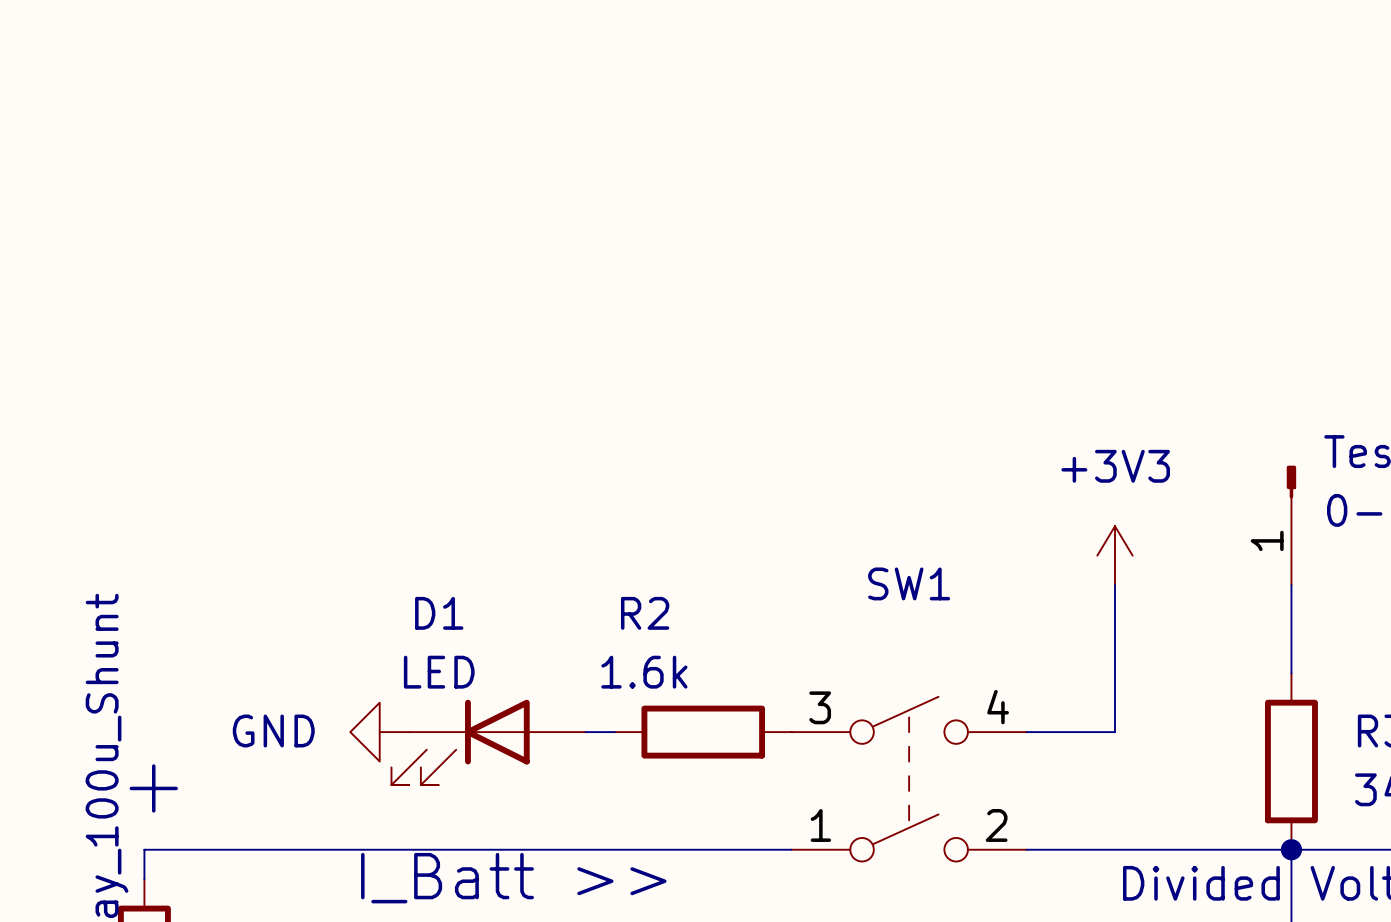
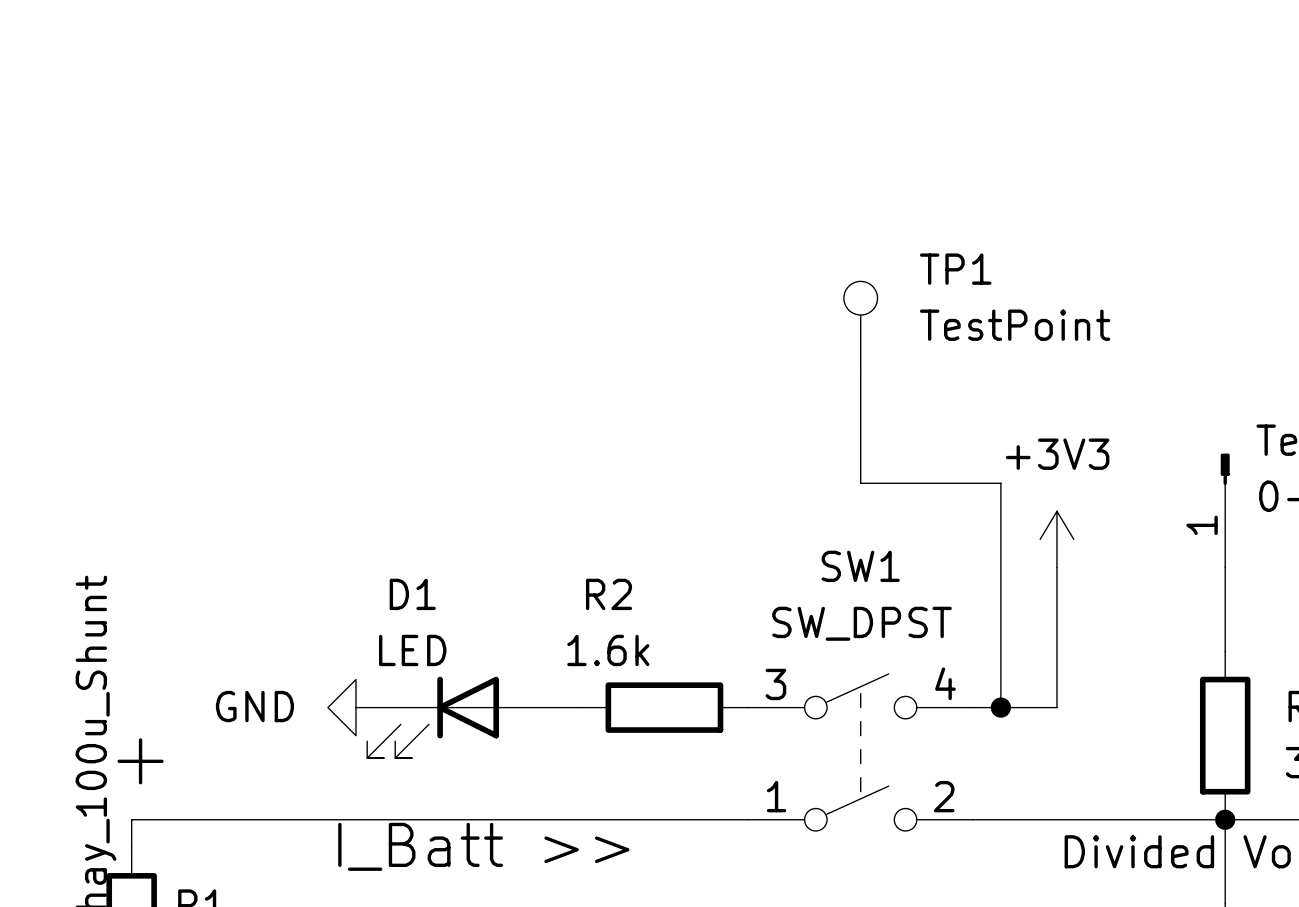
TP1: none -> TestPoint (860, 326)
wire: none -> (860, 371) (860, 483) (1000, 483) (1000, 707)
SW1 value: none -> SW_DPST (862, 623)
junction: none -> (1000, 707)

